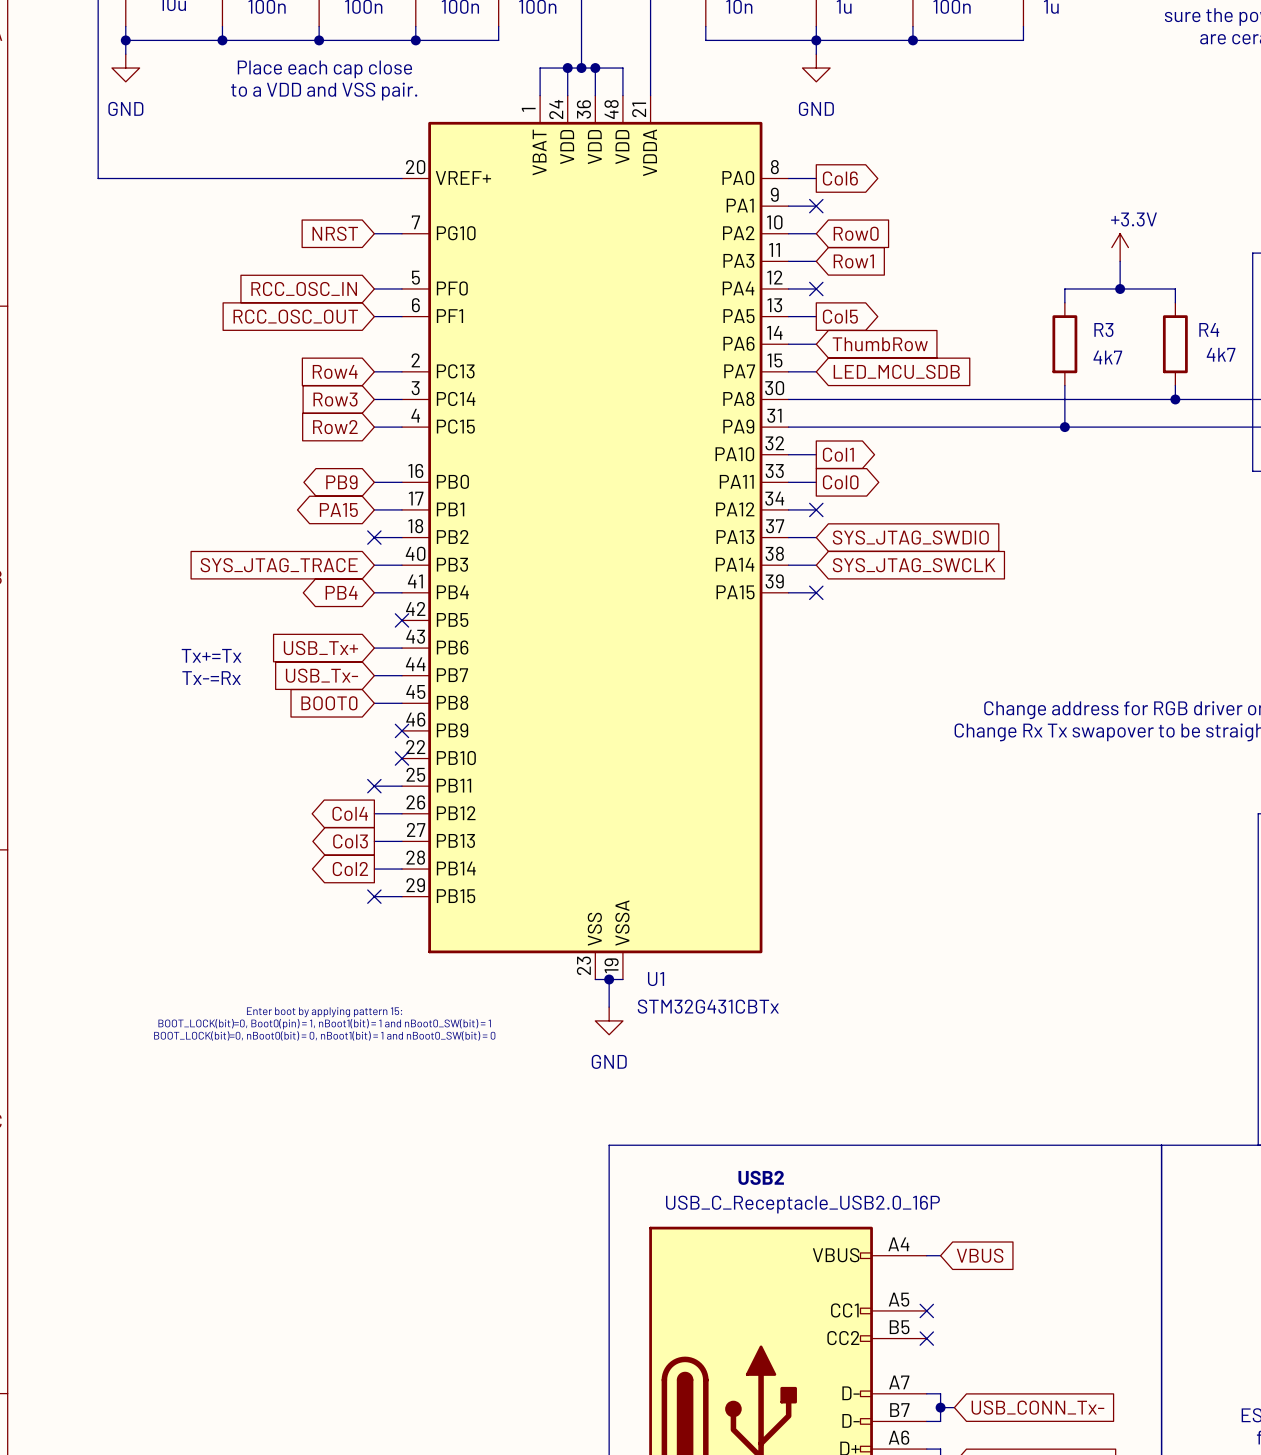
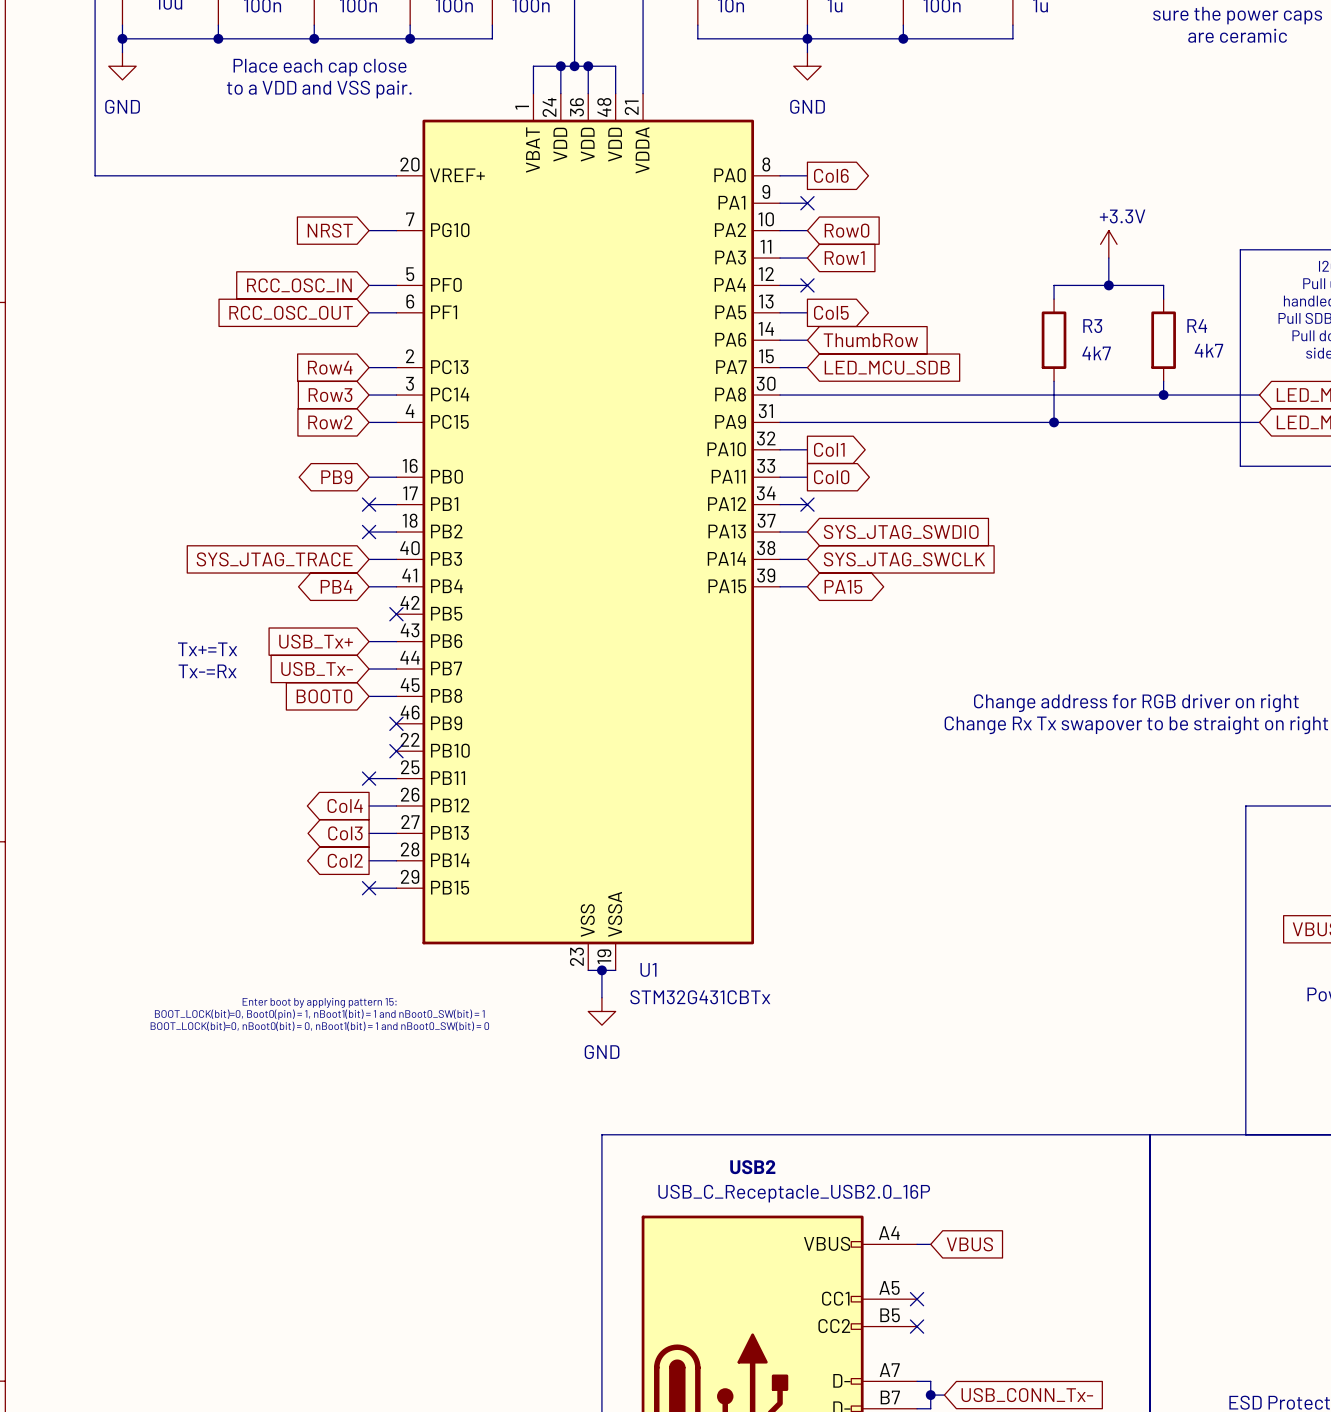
no-connect mark: none -> (369, 504)
global label: PA15 (338, 510) -> none
no-connect mark: (816, 592) -> none
global label: none -> PA15 (843, 586)

